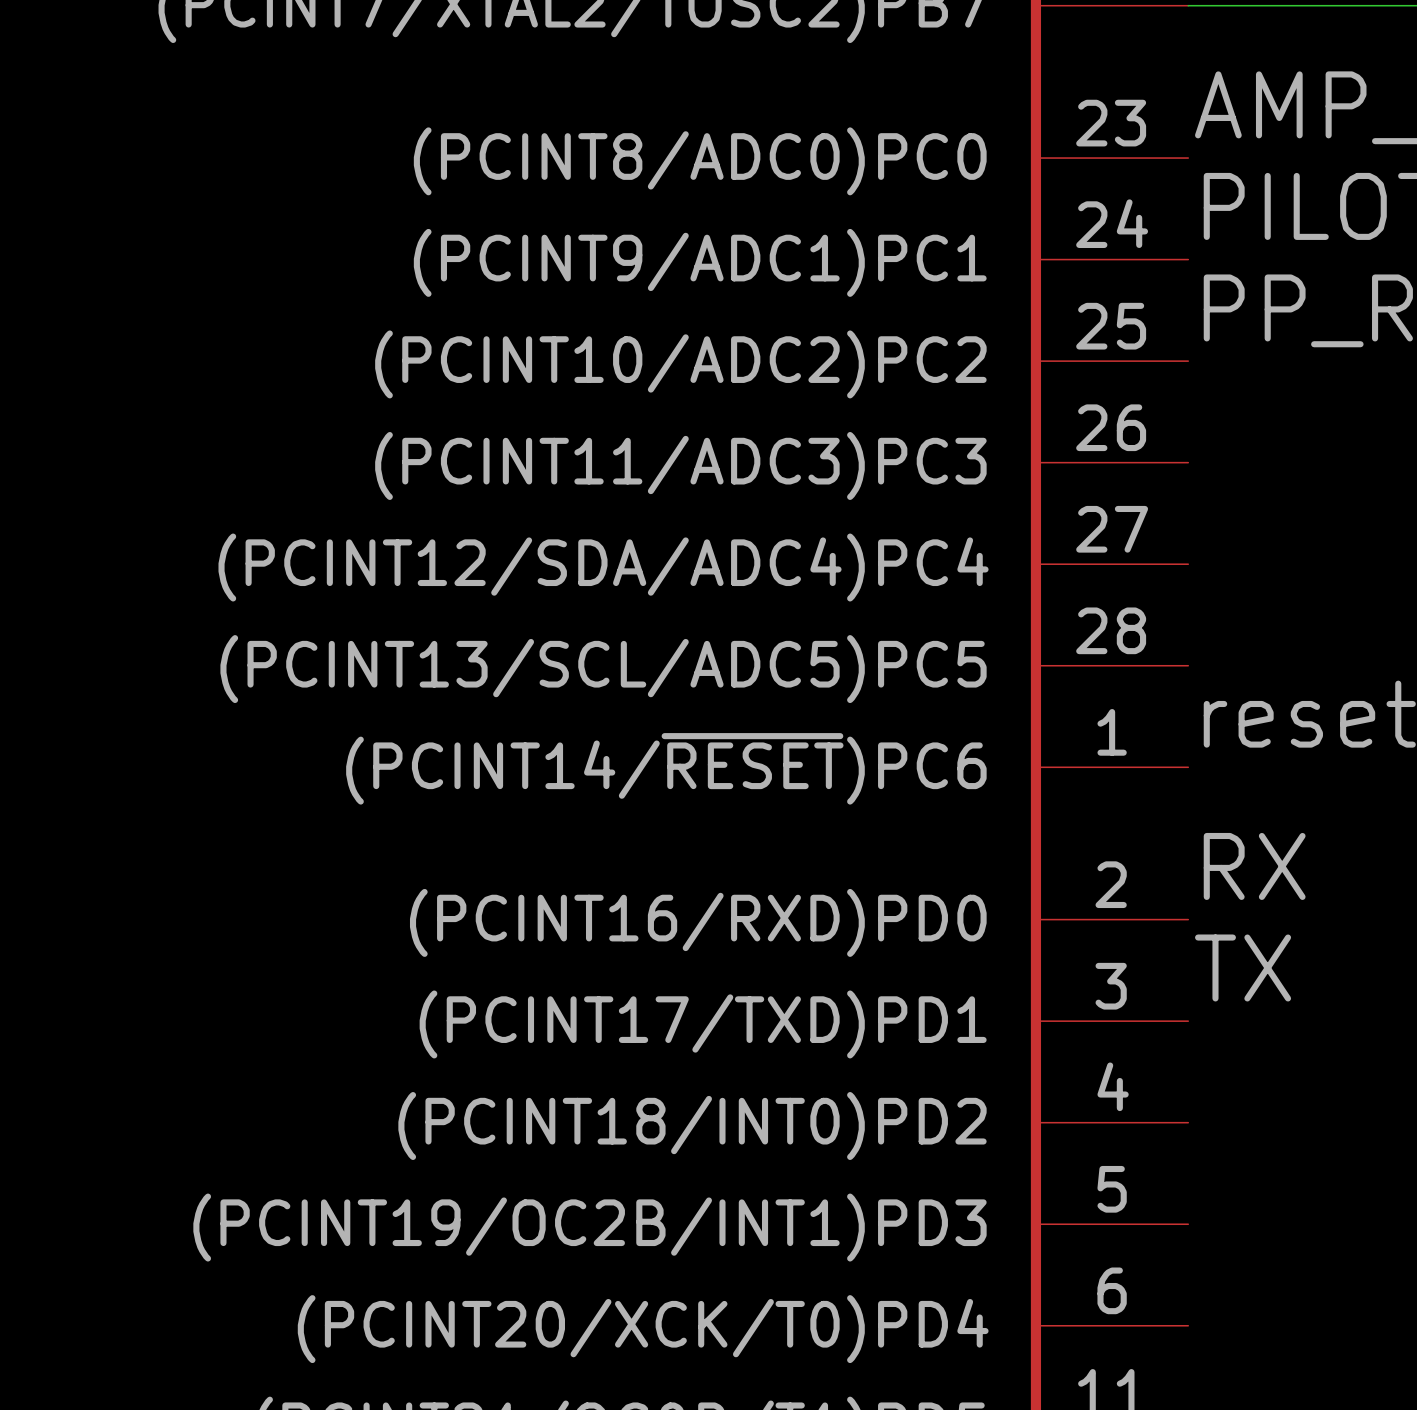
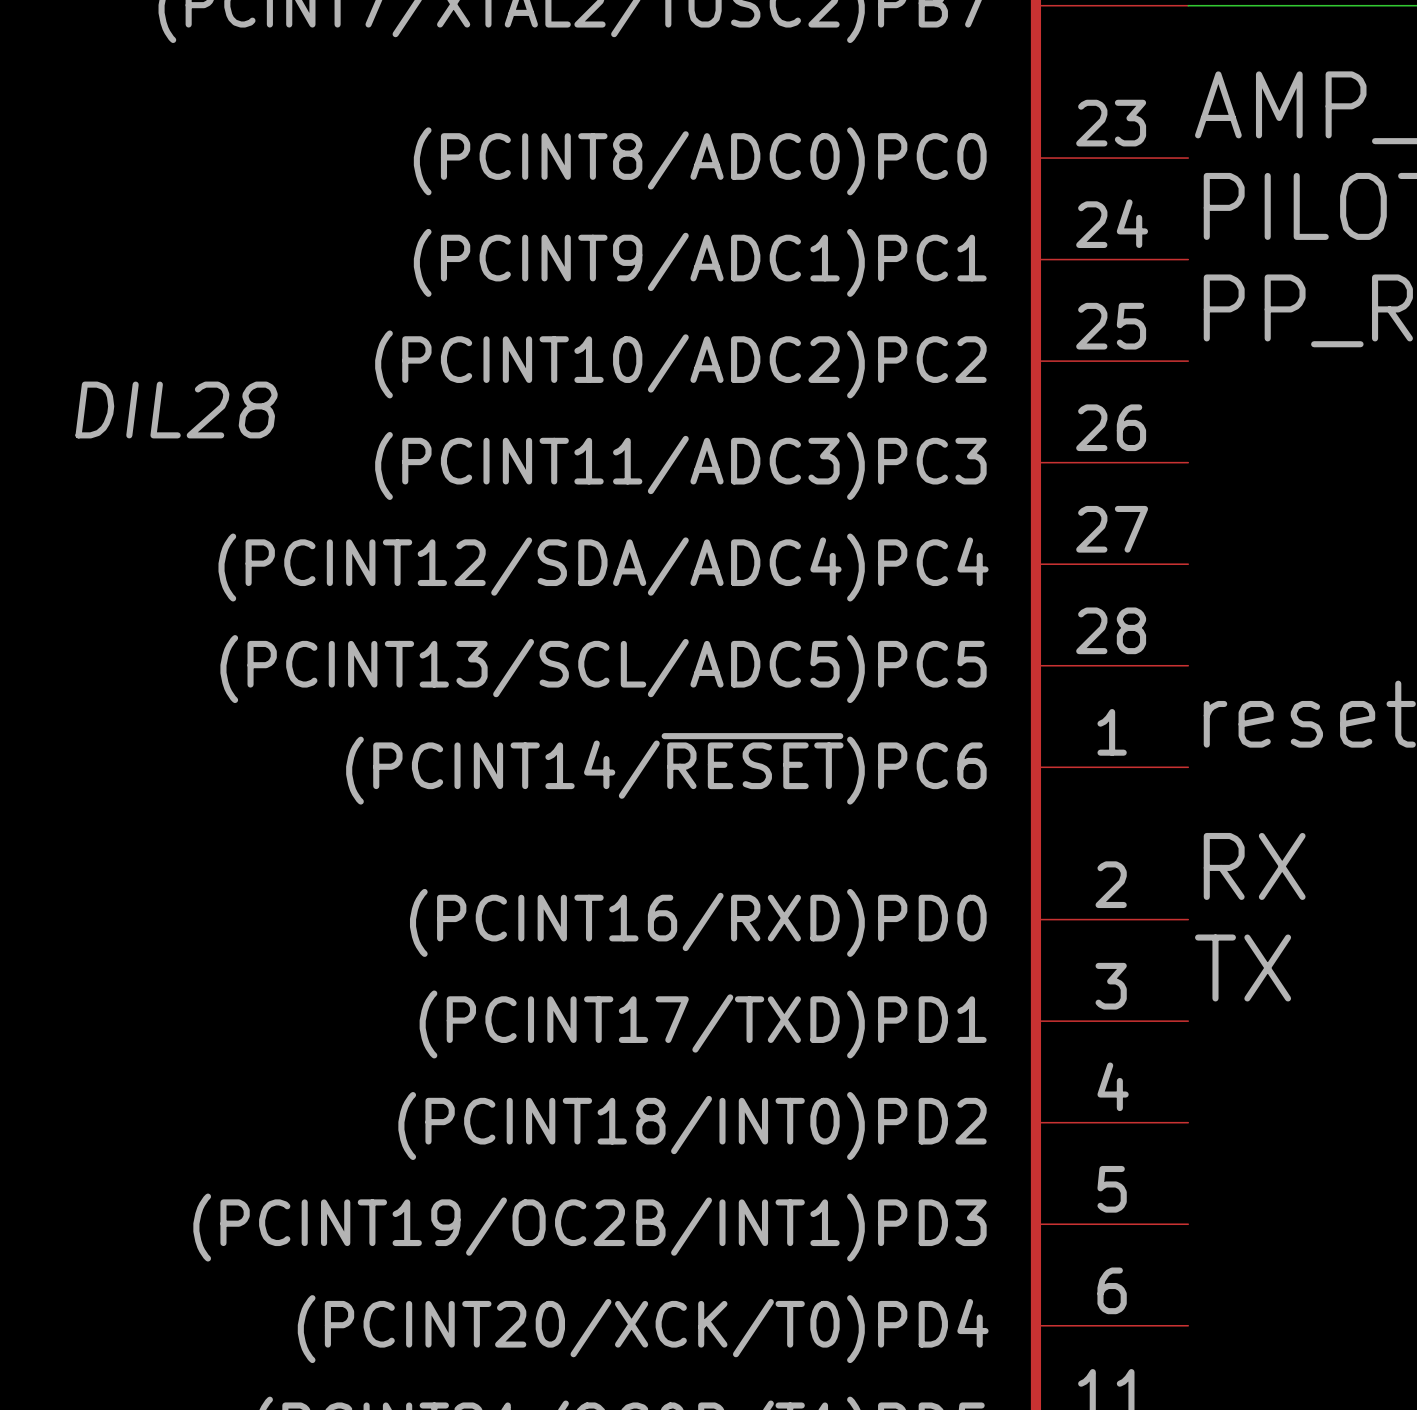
part text: none -> DIL28 (176, 409)

